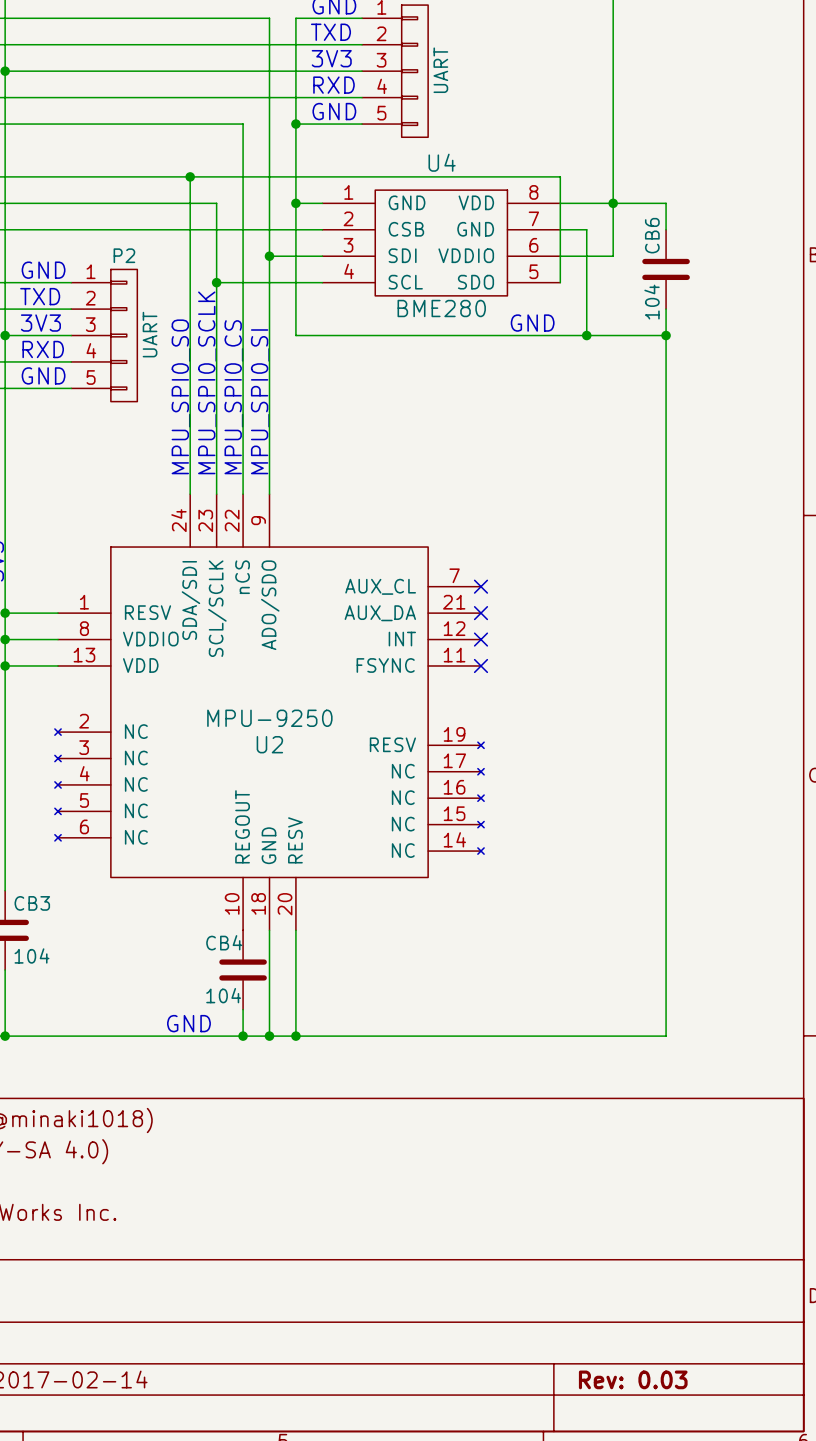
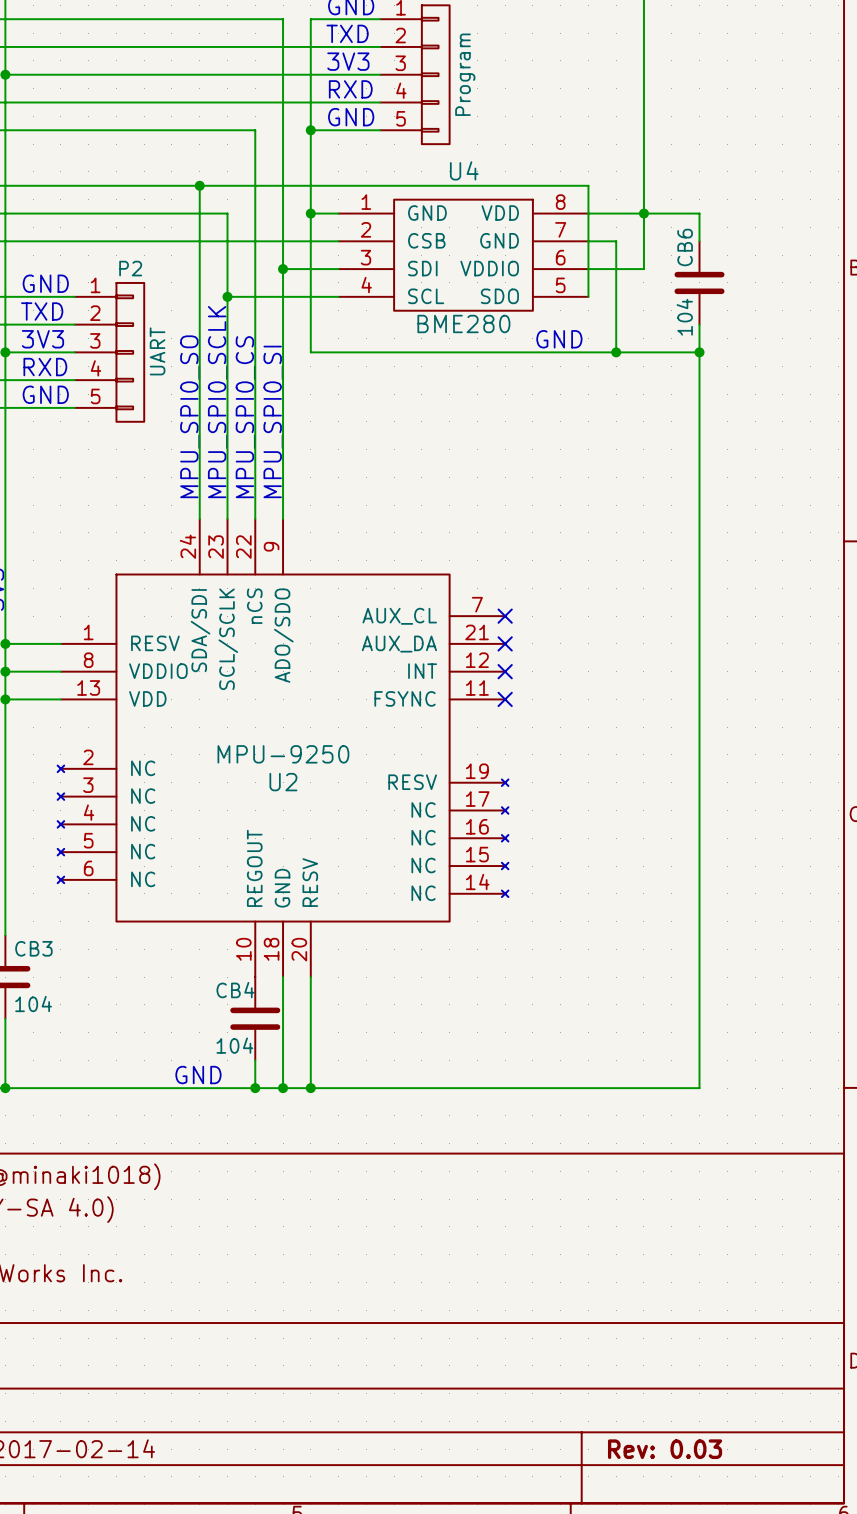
part value: UART (440, 70) -> Program (465, 74)

